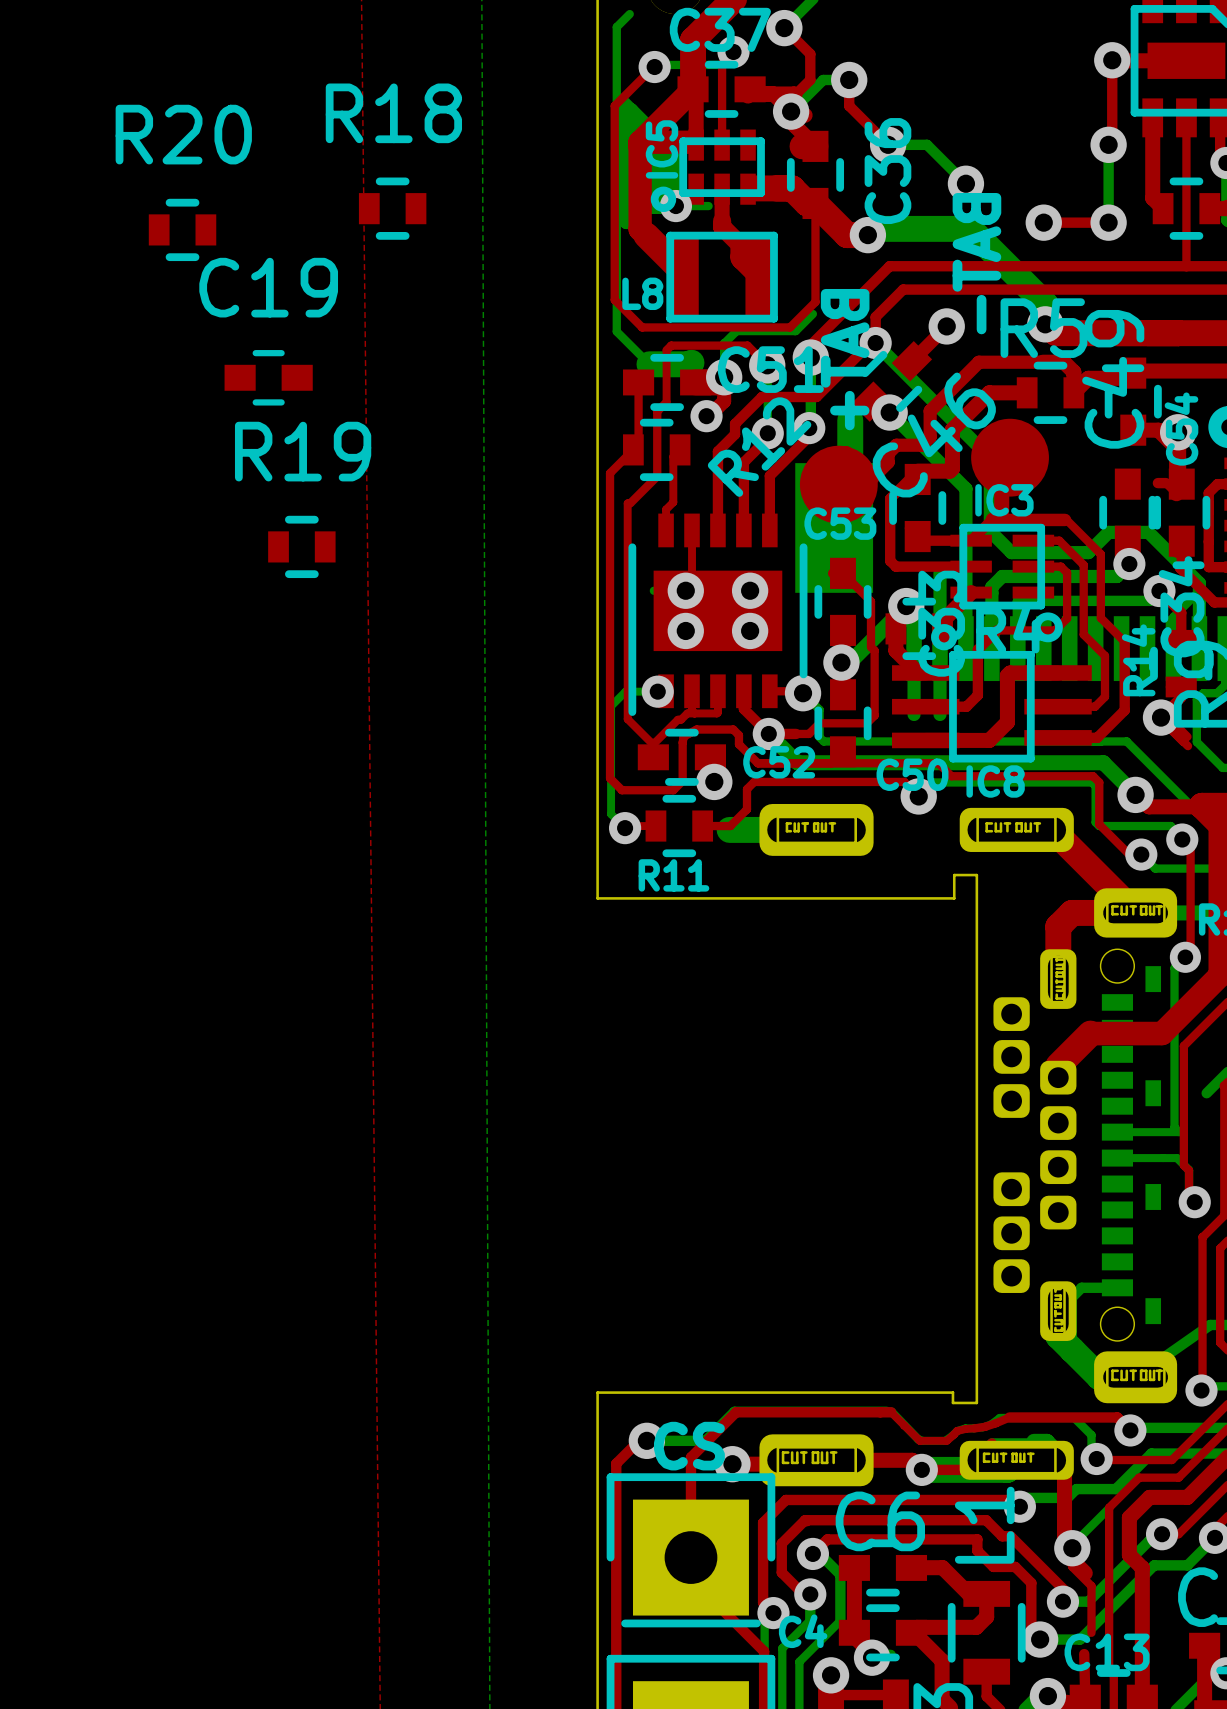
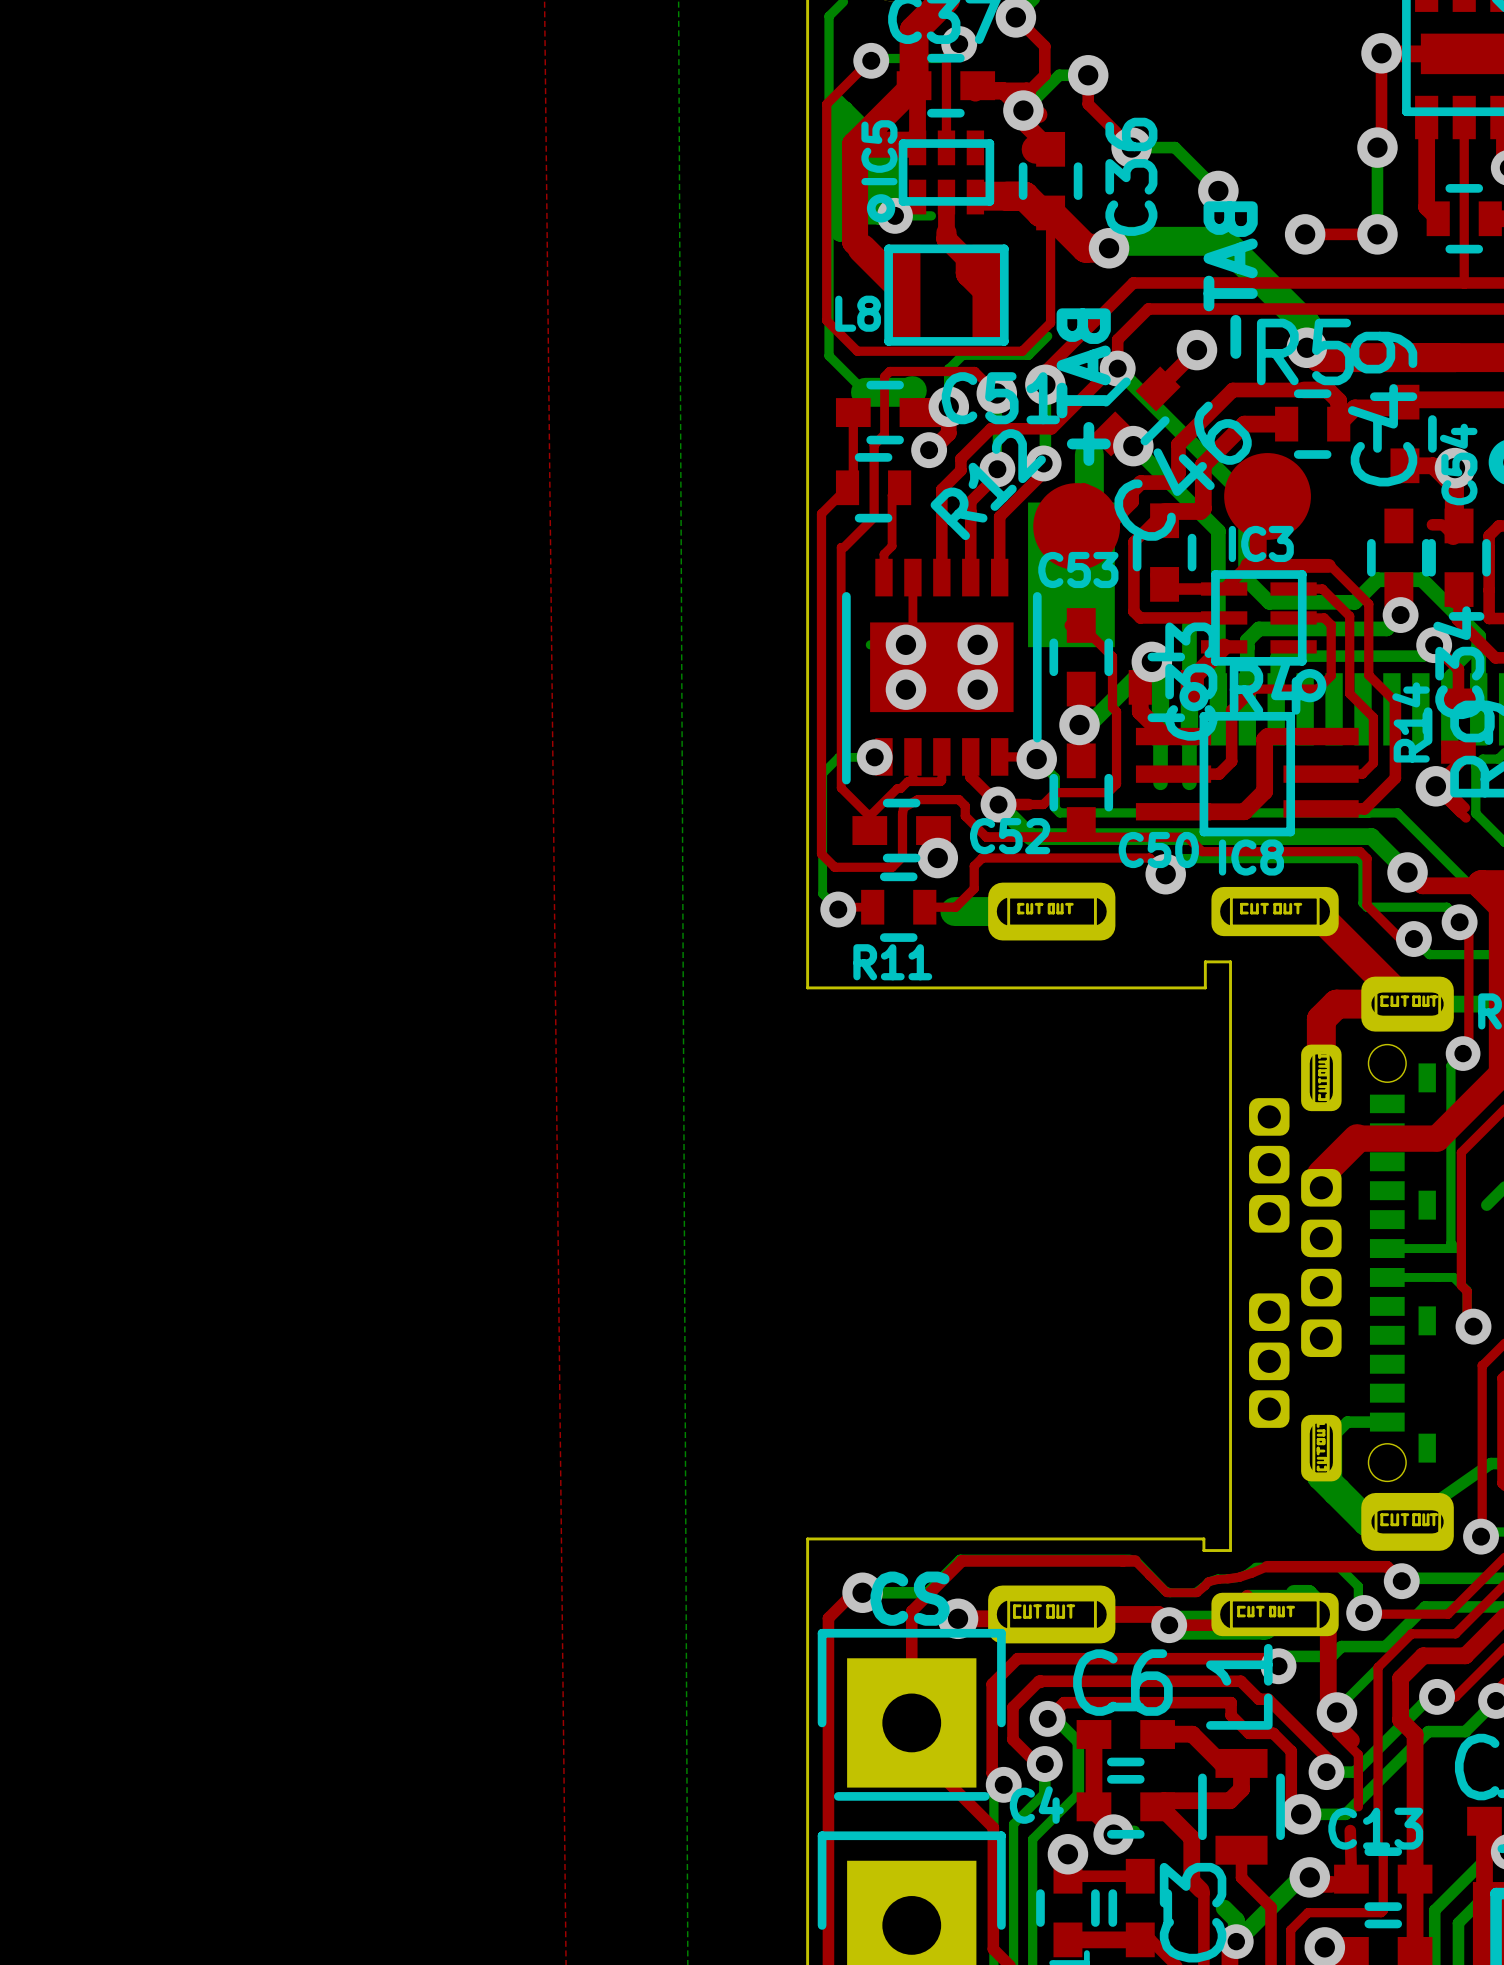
R18: (392, 208) -> none
R20: (182, 229) -> none
C19: (268, 377) -> none
R19: (301, 546) -> none

